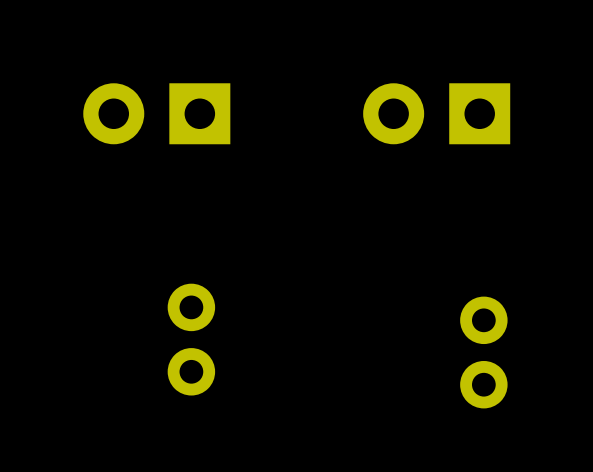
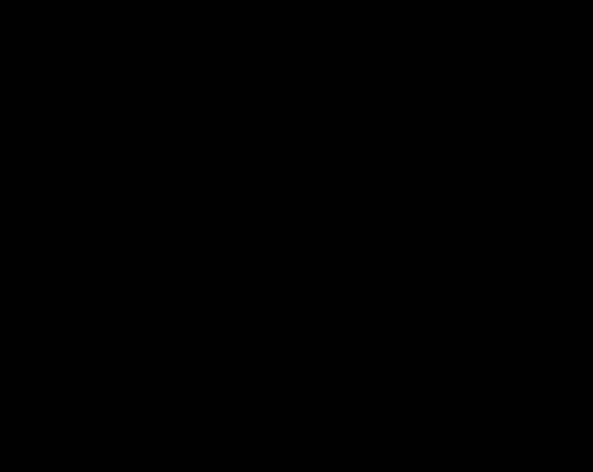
part: (156, 113) -> none
part: (436, 113) -> none
part: (191, 339) -> none
part: (483, 352) -> none

